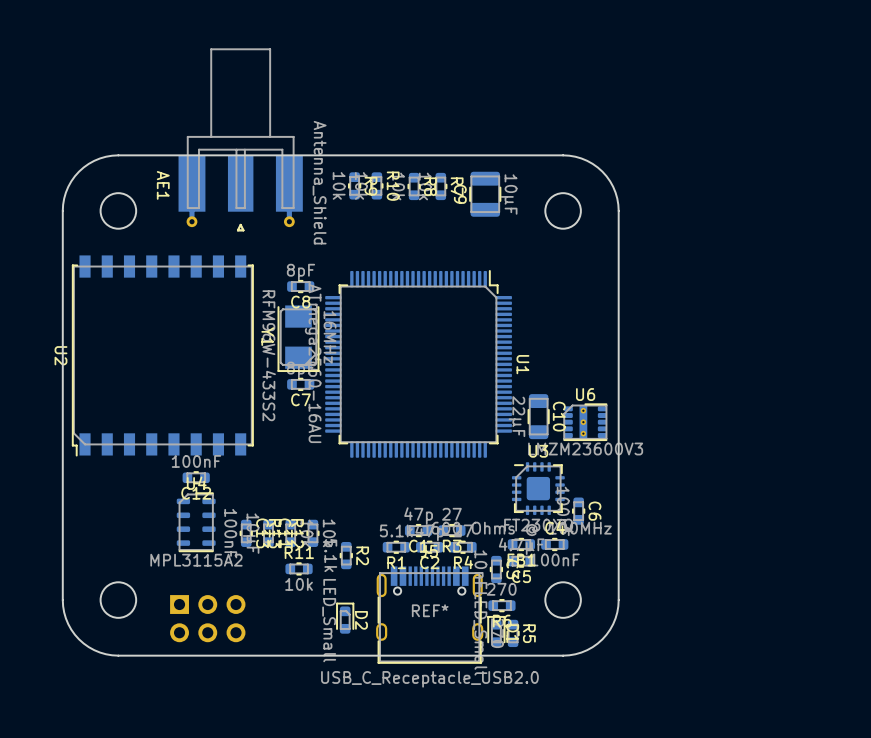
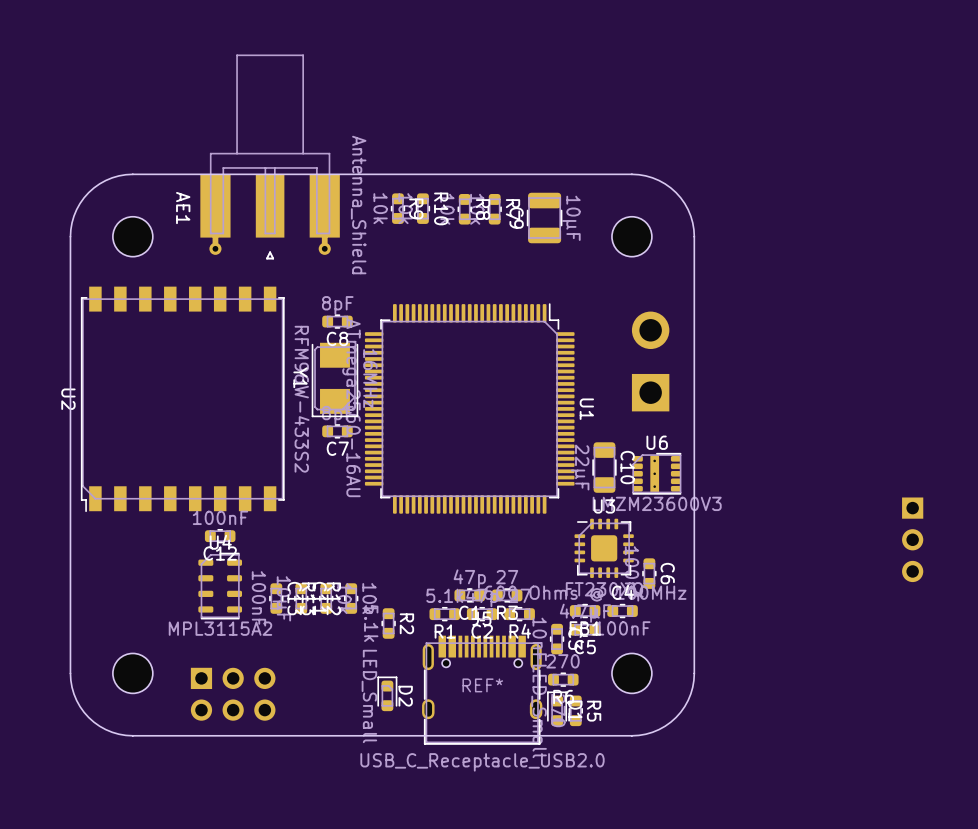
part: none -> (650, 361)
part: none -> (912, 539)
R11: 10k (299, 568) -> none

